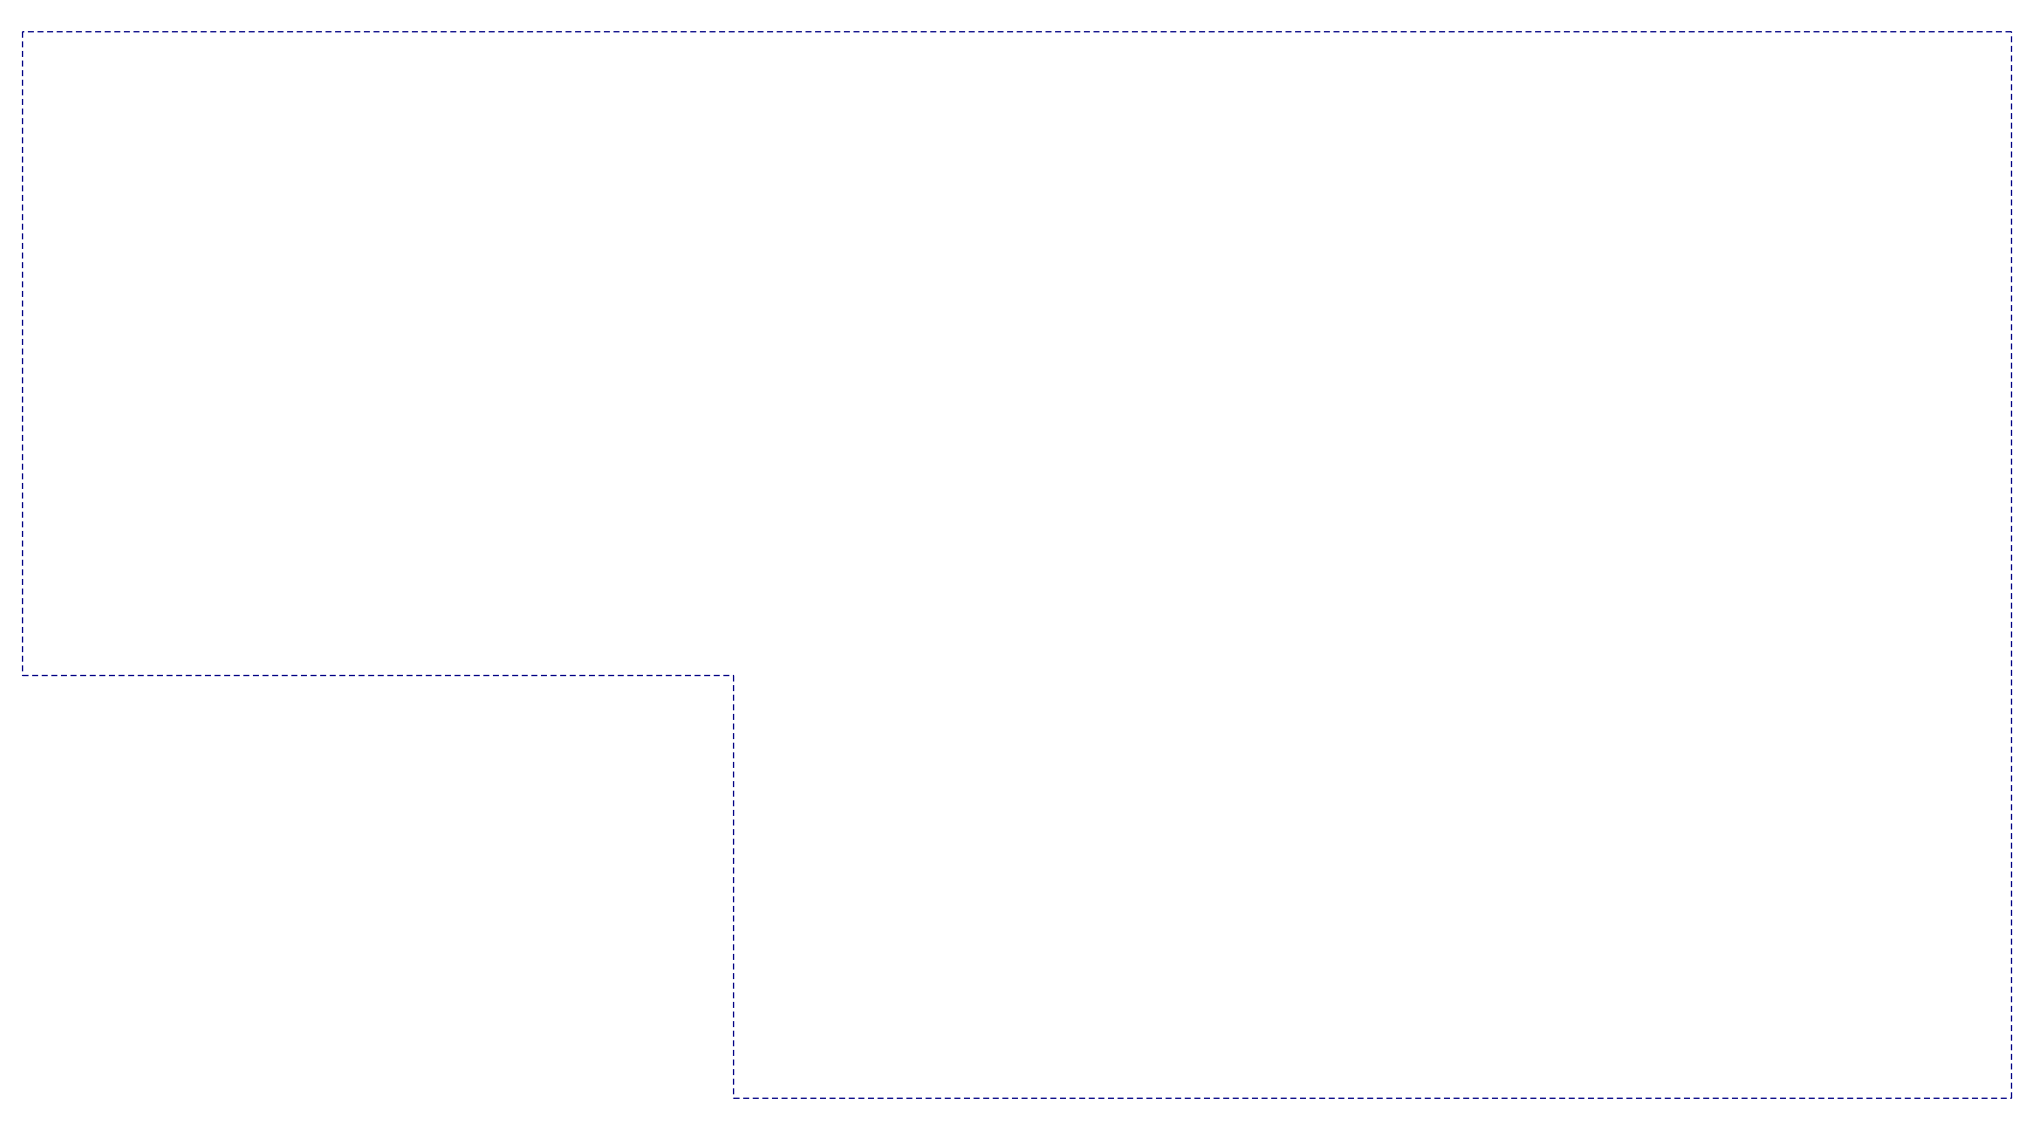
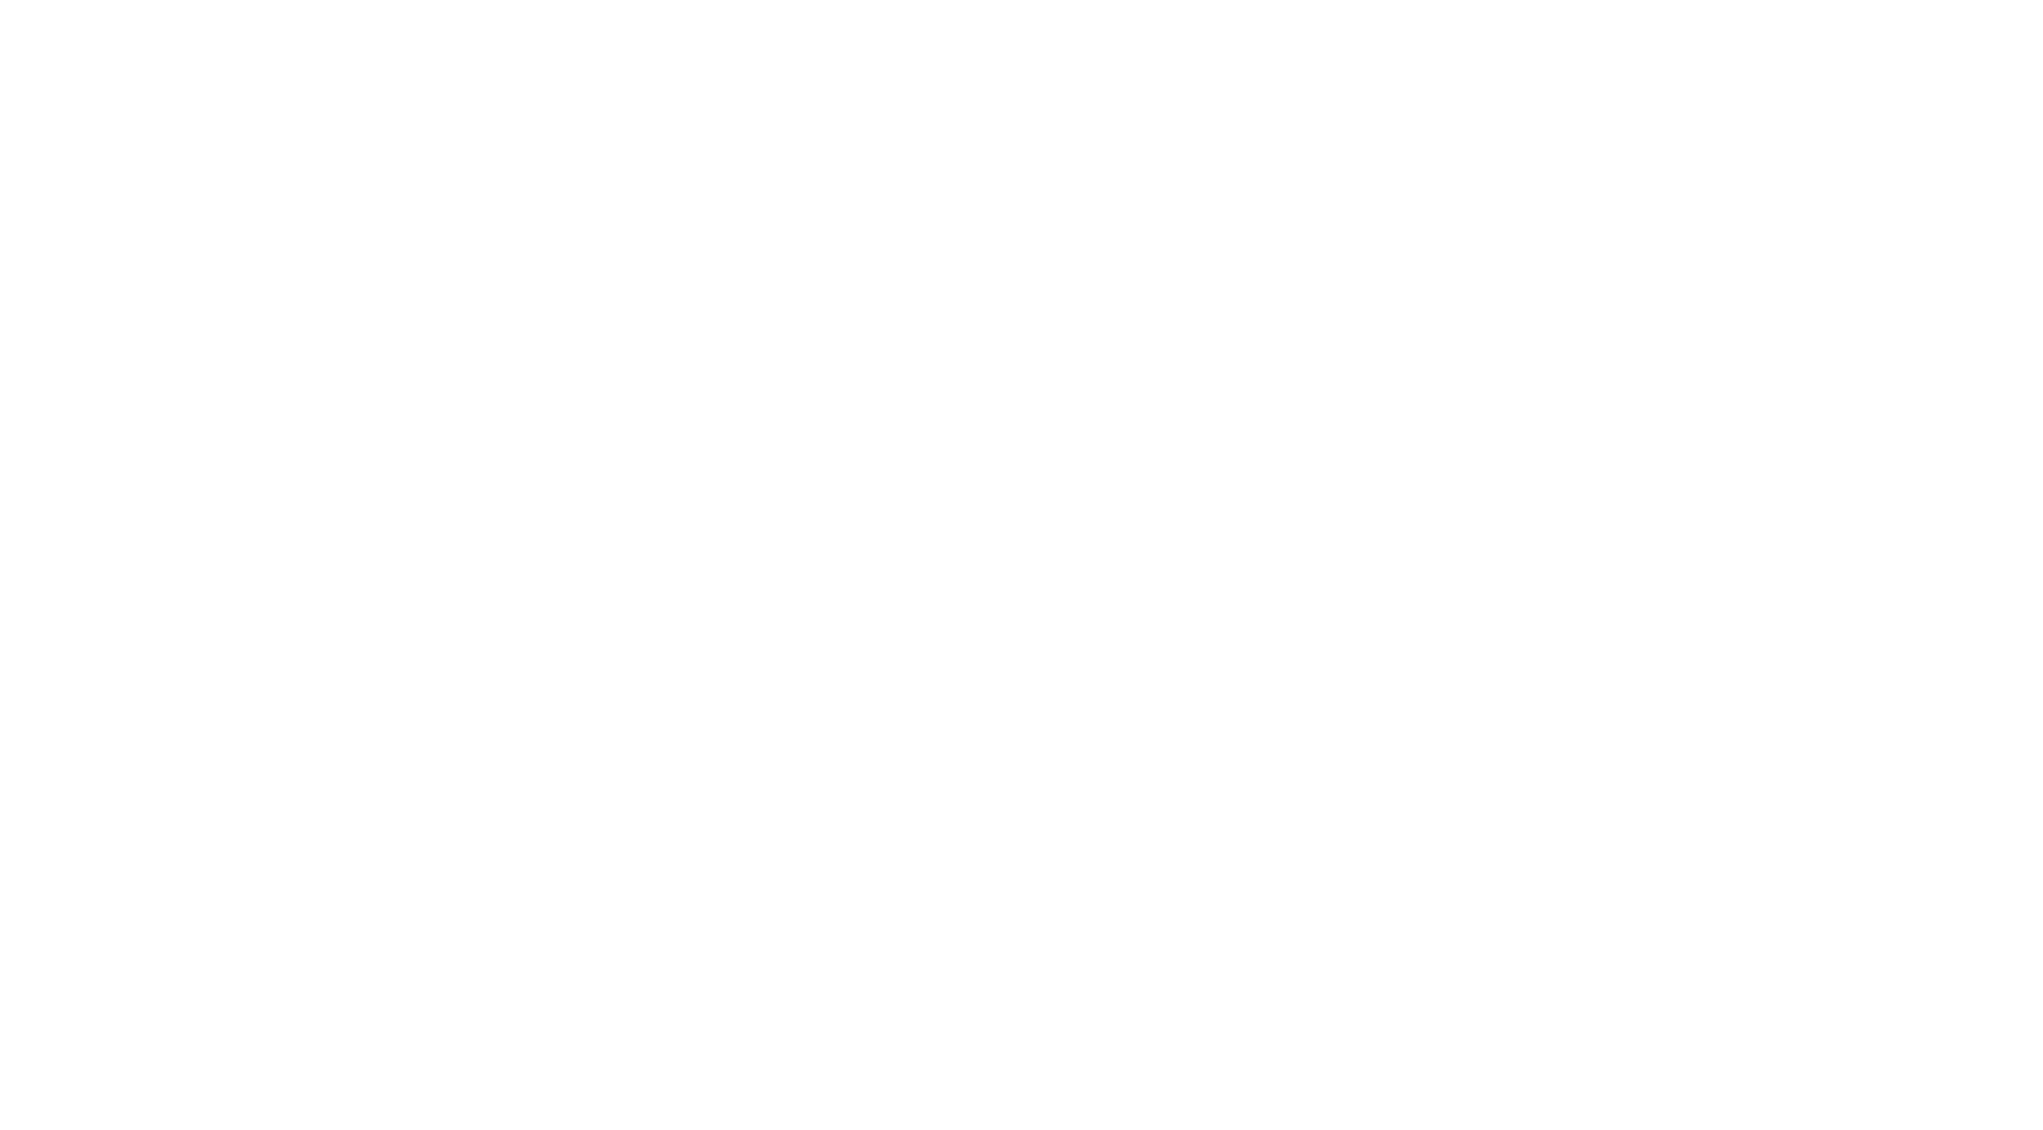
line: (22, 31) (2011, 31) (2011, 1098) (733, 1098) (733, 675) (22, 675) (22, 31) -> none

